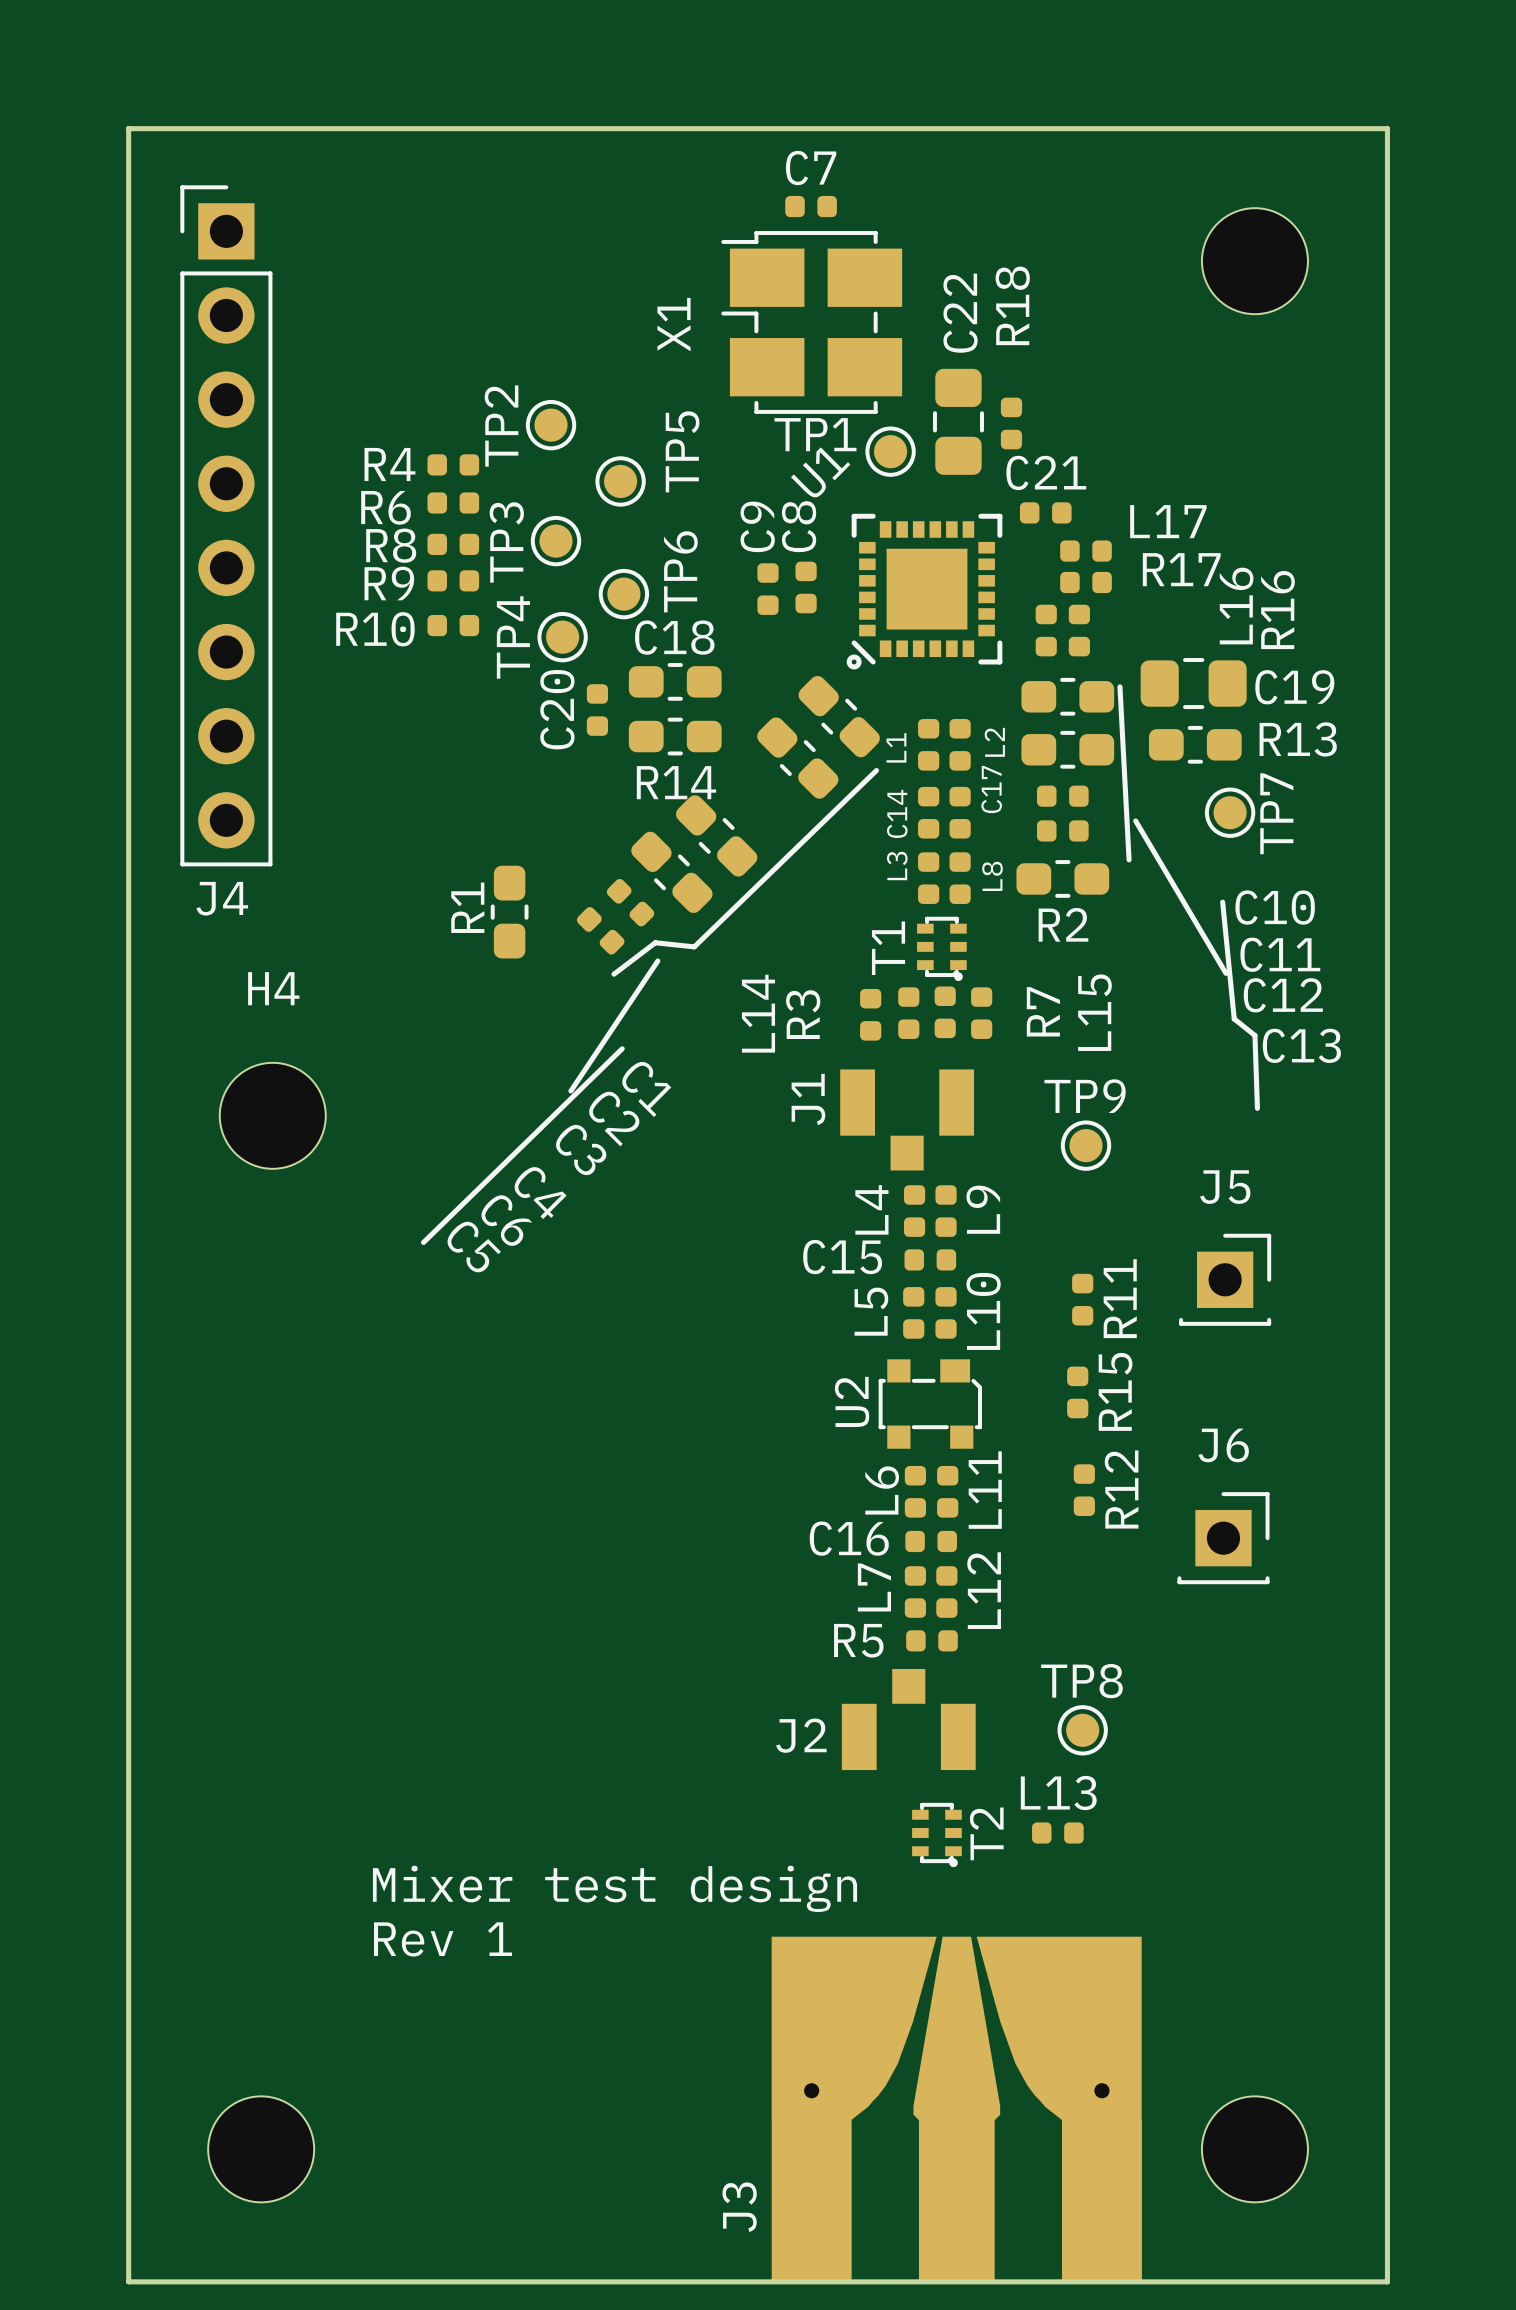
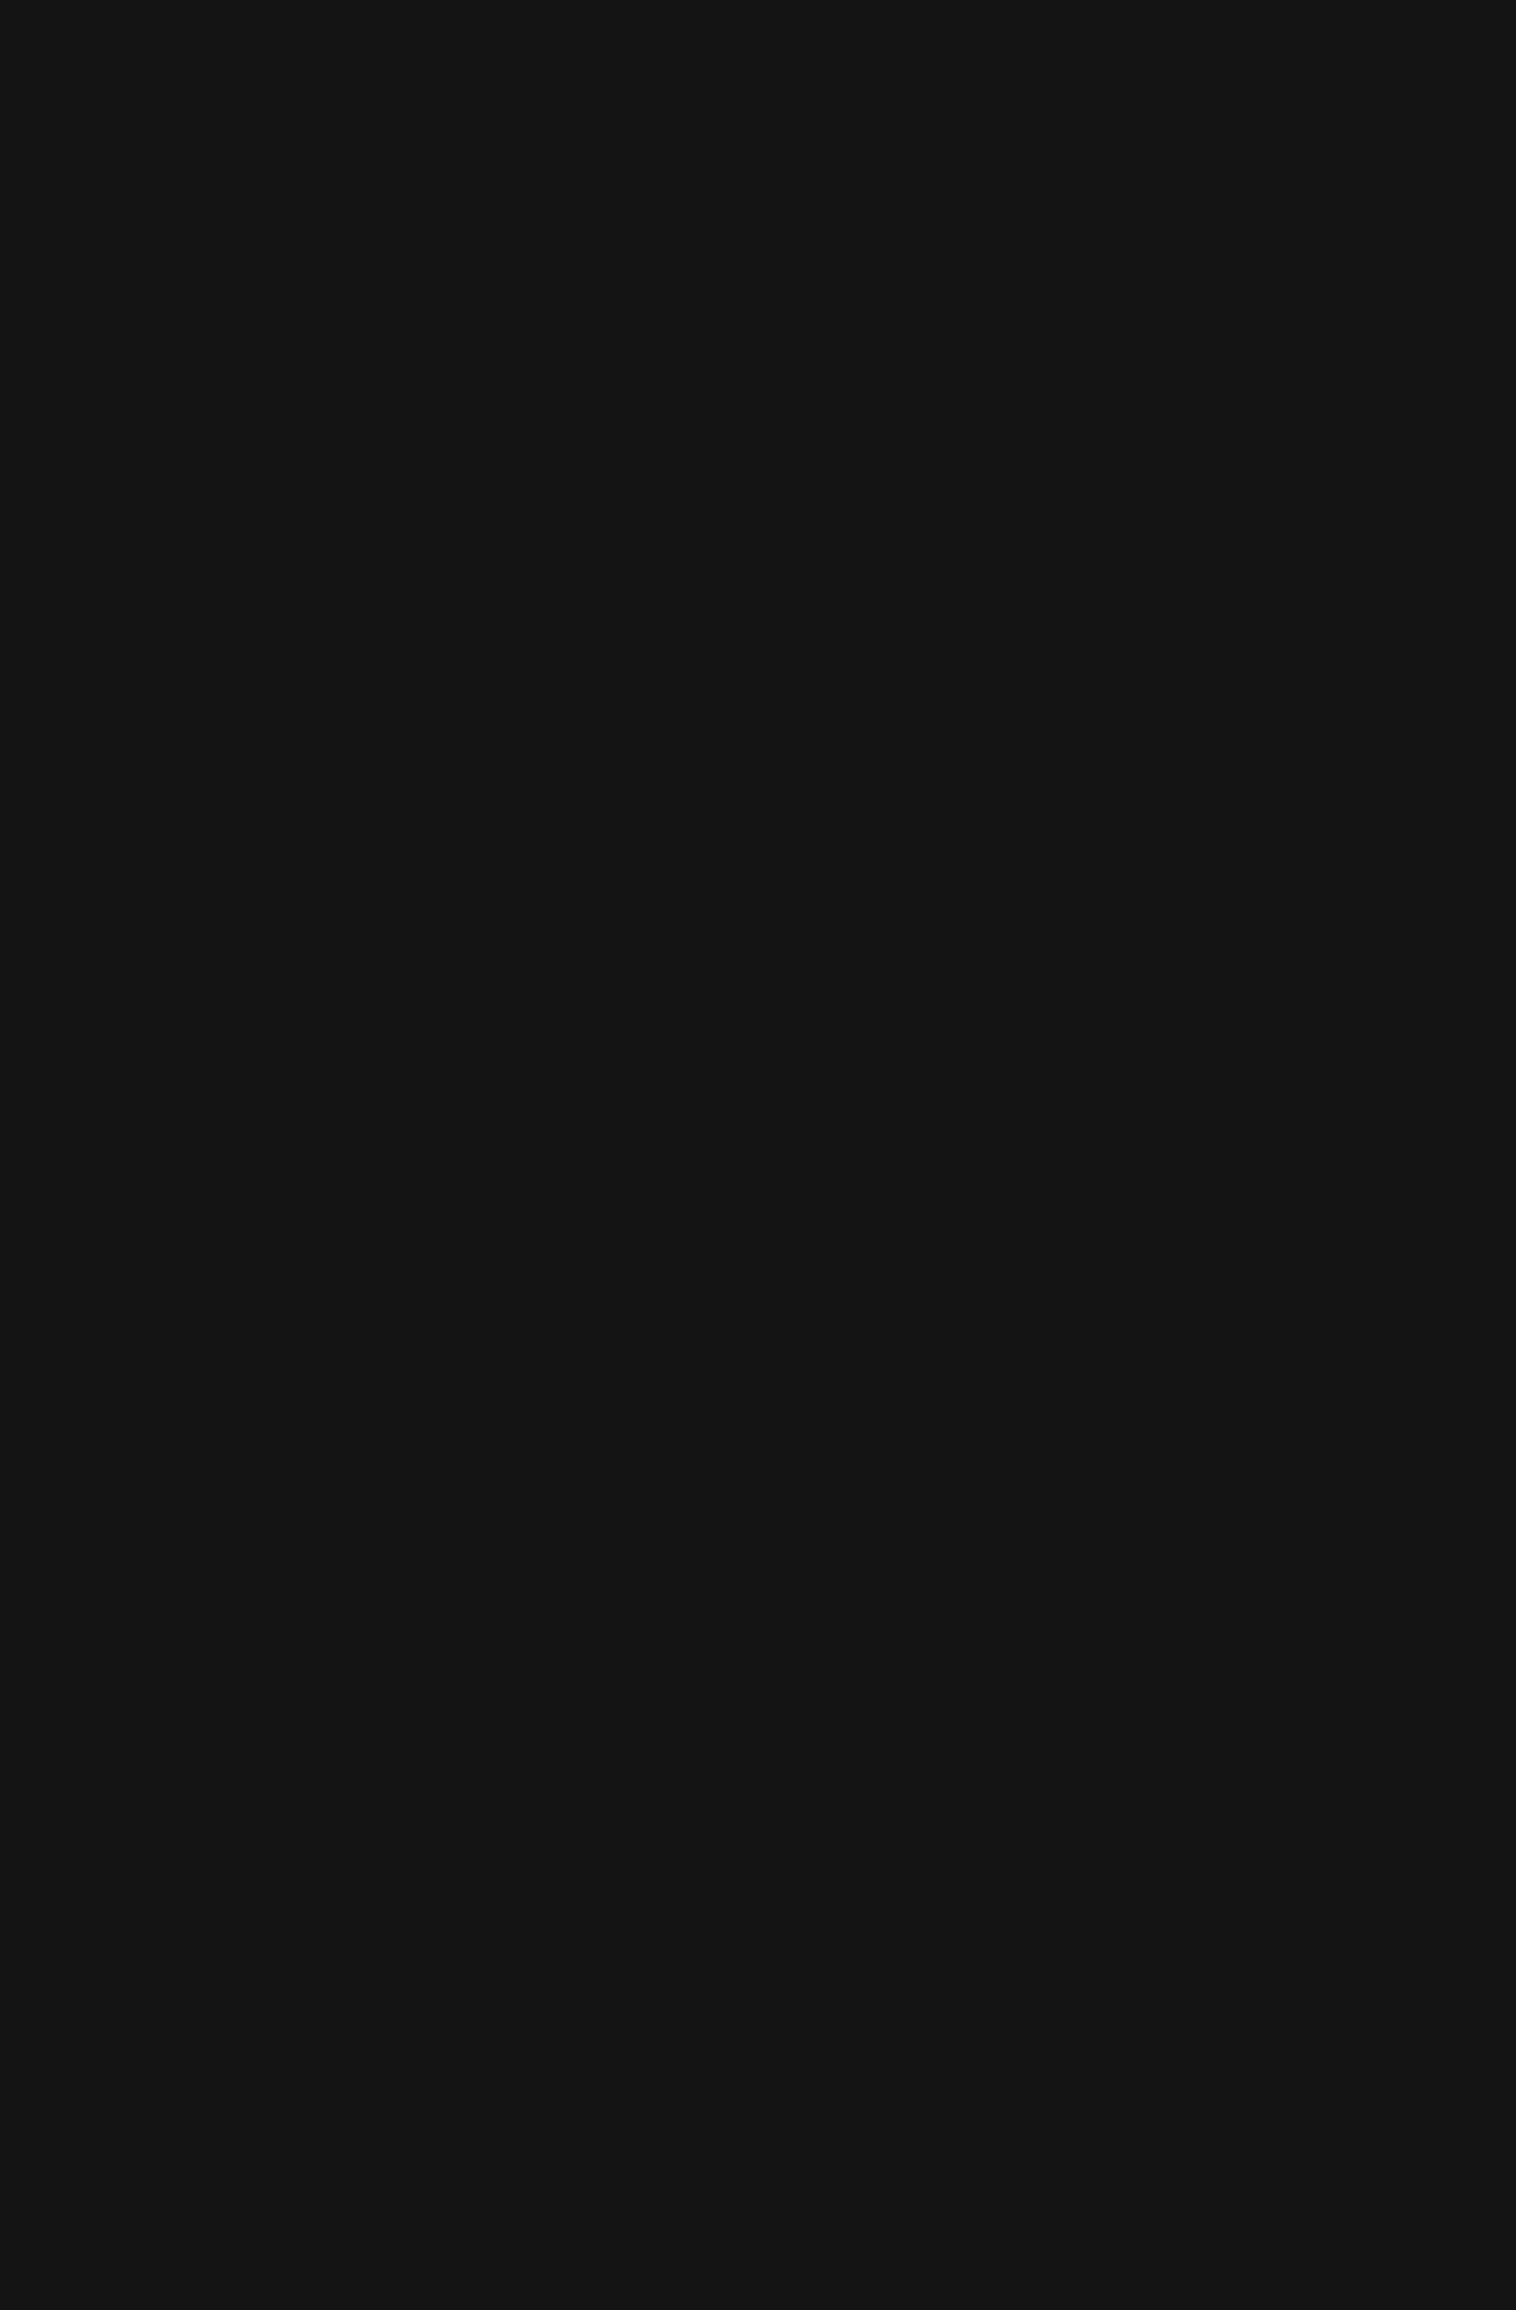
board edge: (128, 128) (128, 2281) (1387, 2281) (1387, 128) (128, 128) -> none
C7: (811, 206) -> none
part: (1254, 261) -> none
X1: (811, 322) -> none
C22: (958, 421) -> none
R18: (1011, 423) -> none
TP2: (551, 425) -> none
TP1: (890, 451) -> none
R4: (453, 464) -> none
TP5: (620, 481) -> none
R6: (453, 502) -> none
C21: (1045, 512) -> none
J4: (226, 525) -> none
TP3: (555, 541) -> none
R8: (453, 544) -> none
L17: (1086, 551) -> none
R9: (453, 580) -> none
R17: (1086, 582) -> none
C8: (806, 587) -> none
C9: (768, 589) -> none
U1: (924, 591) -> none
TP6: (623, 594) -> none
R10: (453, 625) -> none
L16: (1046, 630) -> none
R16: (1079, 630) -> none
TP4: (562, 637) -> none
C18: (675, 681) -> none
C19: (1193, 683) -> none
line: (1119, 686) (1129, 859) -> none
C10: (1067, 696) -> none
C20: (597, 710) -> none
C1: (839, 716) -> none
R14: (675, 736) -> none
L1: (928, 744) -> none
L2: (960, 744) -> none
R13: (1195, 744) -> none
C11: (1067, 749) -> none
C2: (797, 758) -> none
line: (876, 770) (694, 946) (655, 942) (613, 974) -> none
C12: (1062, 796) -> none
C14: (928, 812) -> none
C17: (960, 812) -> none
TP7: (1230, 812) -> none
line: (1135, 821) (1225, 973) -> none
C13: (1062, 830) -> none
C3: (716, 835) -> none
C4: (671, 872) -> none
L3: (928, 878) -> none
L8: (960, 878) -> none
R2: (1062, 878) -> none
C6: (630, 902) -> none
line: (1222, 902) (1234, 1018) (1254, 1035) (1257, 1108) -> none
R1: (509, 912) -> none
C5: (600, 930) -> none
T1: (941, 948) -> none
line: (657, 960) (570, 1090) -> none
R7: (945, 1012) -> none
R3: (908, 1013) -> none
L15: (981, 1013) -> none
L14: (870, 1014) -> none
line: (622, 1048) (423, 1242) -> none
H4: (272, 1115) -> none
J1: (907, 1119) -> none
TP9: (1086, 1145) -> none
L4: (914, 1211) -> none
L9: (946, 1211) -> none
C15: (930, 1259) -> none
J5: (1225, 1279) -> none
R11: (1082, 1299) -> none
L5: (913, 1312) -> none
L10: (946, 1312) -> none
R15: (1077, 1392) -> none
U2: (930, 1404) -> none
R12: (1084, 1490) -> none
L6: (915, 1491) -> none
L11: (947, 1491) -> none
J6: (1223, 1538) -> none
C16: (931, 1541) -> none
L7: (915, 1592) -> none
L12: (946, 1592) -> none
R5: (931, 1640) -> none
J2: (908, 1719) -> none
TP8: (1082, 1730) -> none
L13: (1057, 1832) -> none
T2: (936, 1834) -> none
text: Mixer test design (615, 1888) -> none
text: Rev 1 (443, 1939) -> none
J3: (956, 2108) -> none
part: (261, 2149) -> none
part: (1254, 2149) -> none

